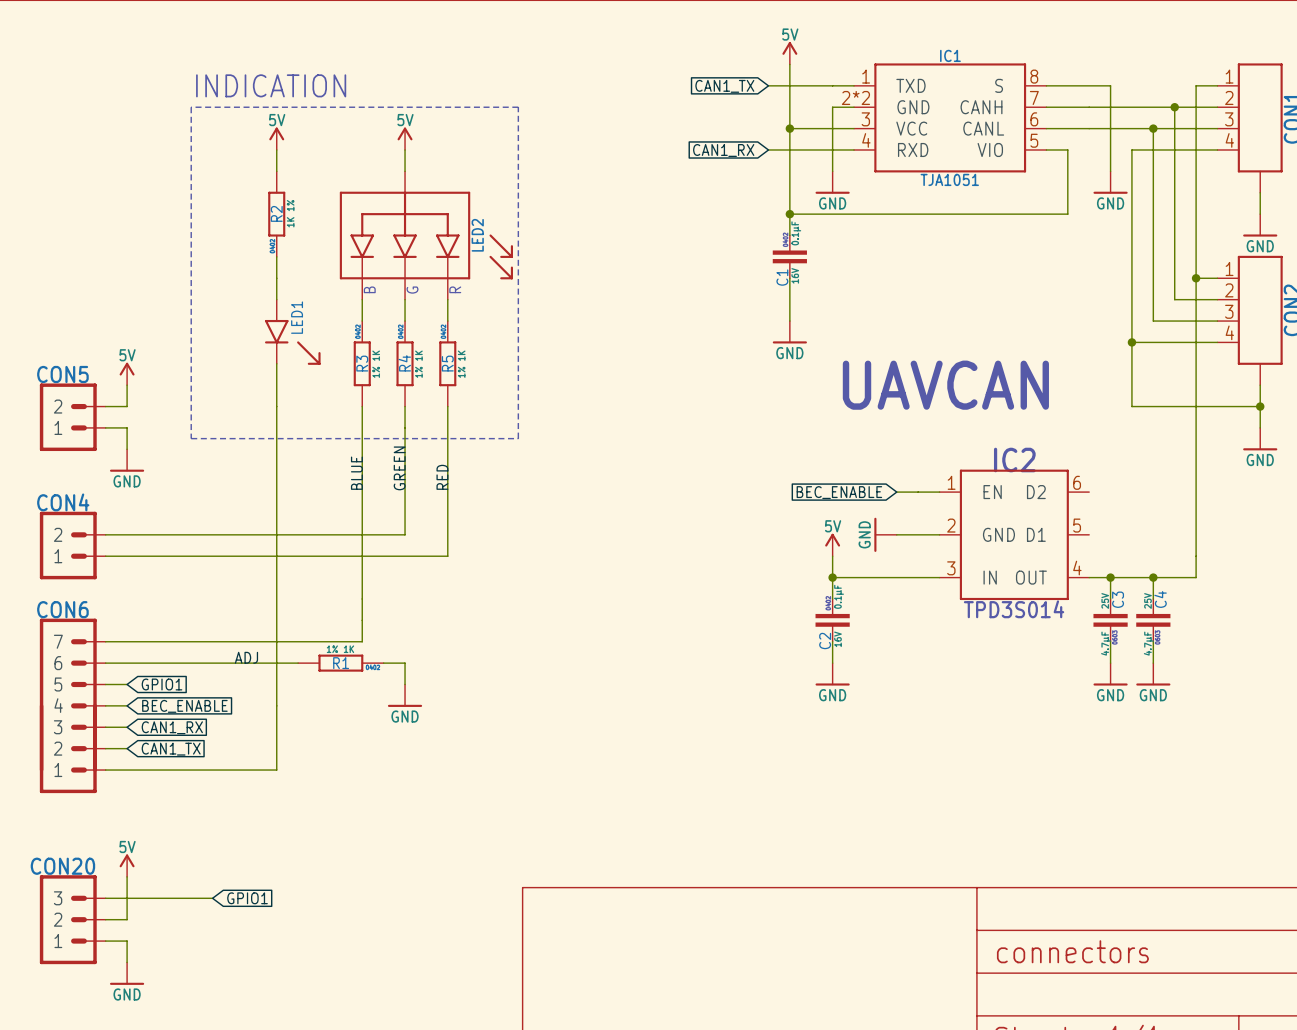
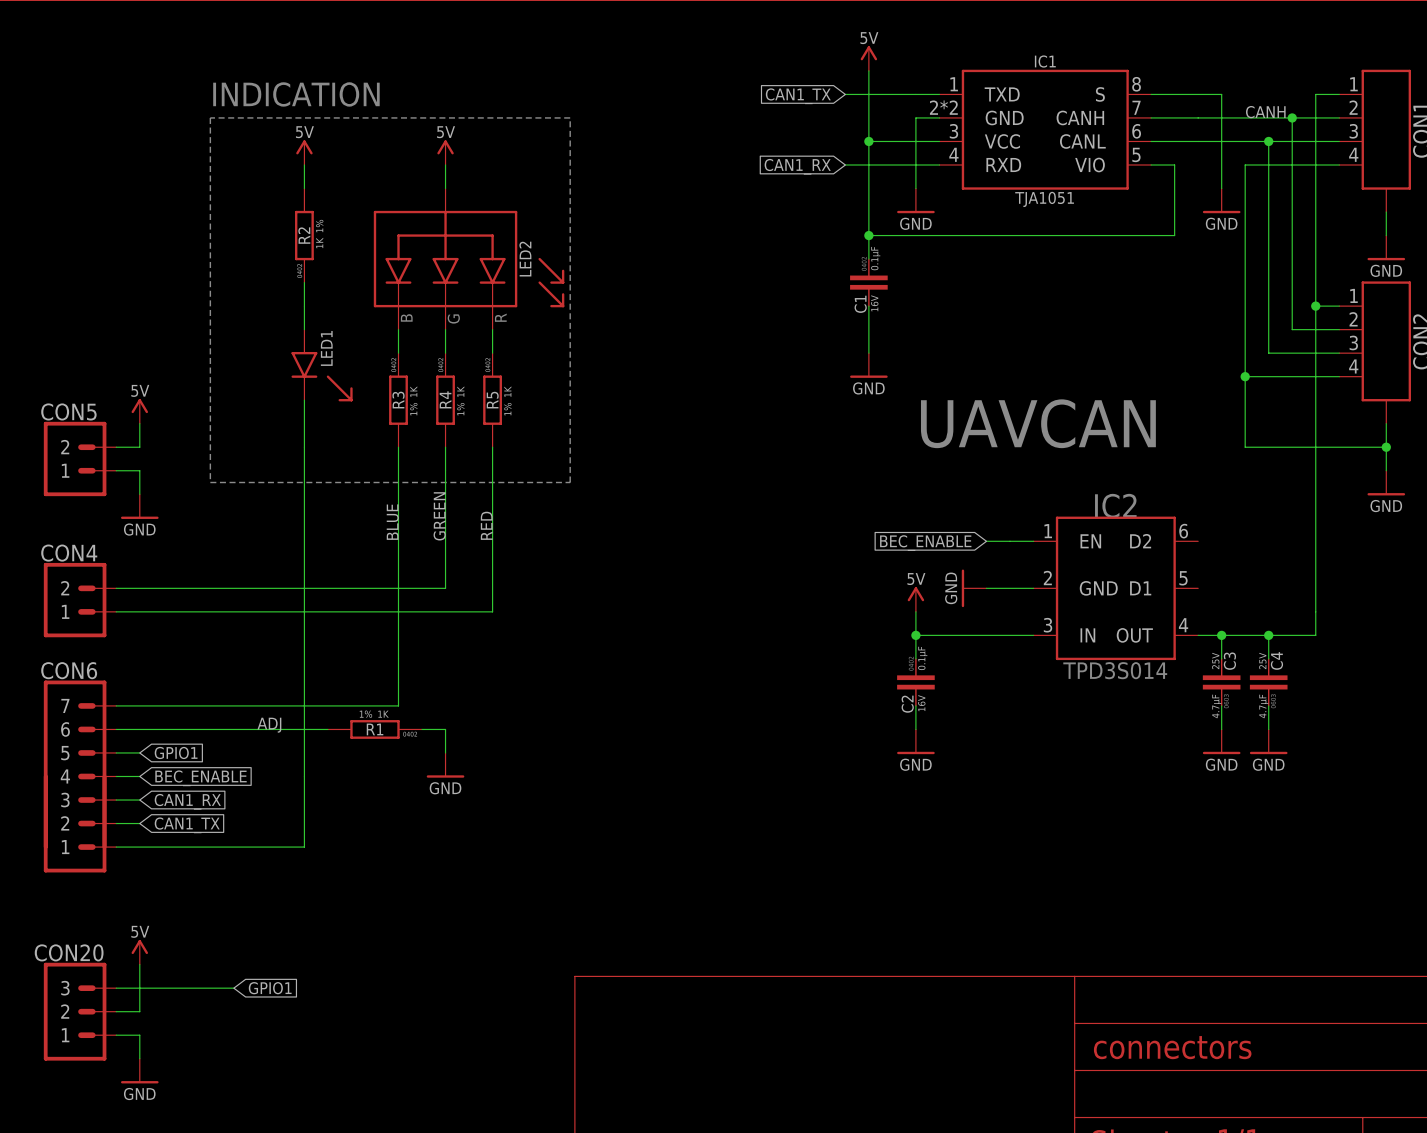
label: none -> CANH (1265, 112)

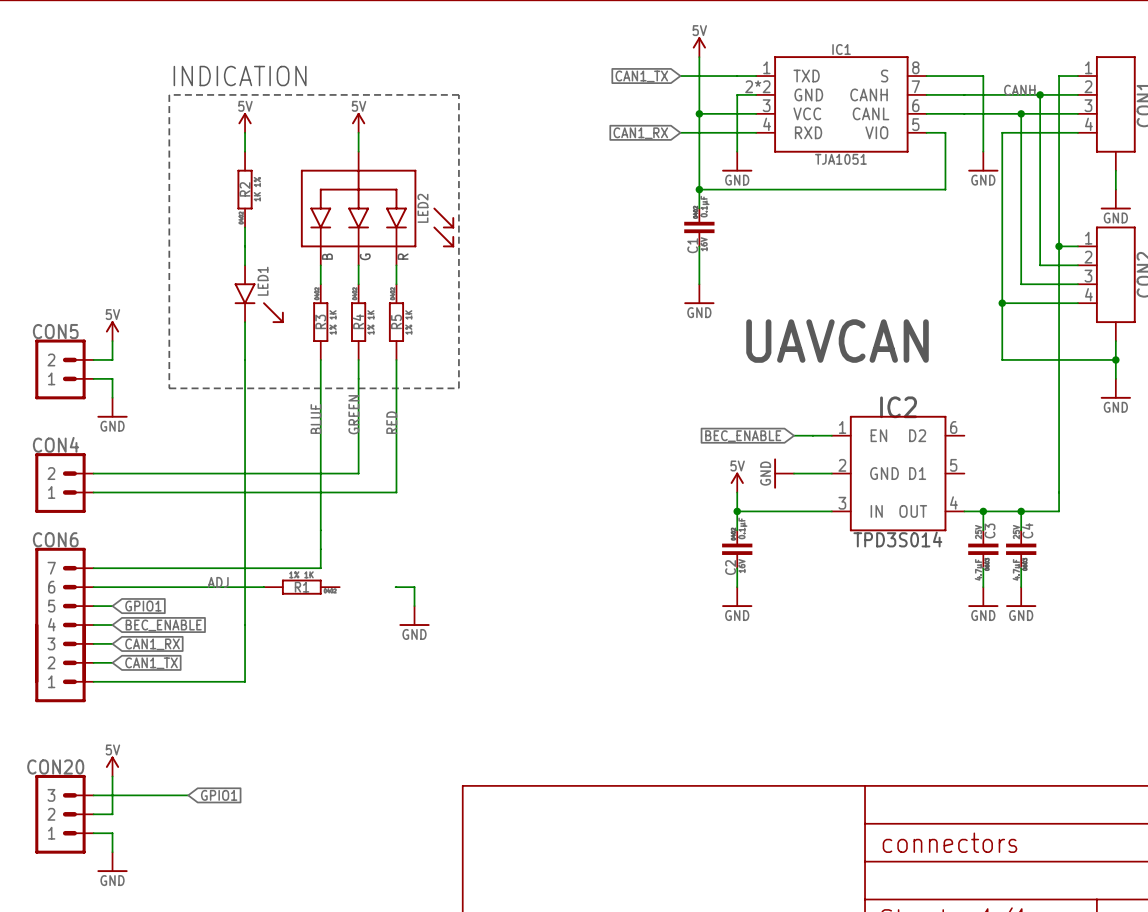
wire: (422, 729) (445, 729) (445, 752) -> (395, 587) (414, 587) (414, 606)
power symbol position: GND (445, 765) -> GND (414, 616)

